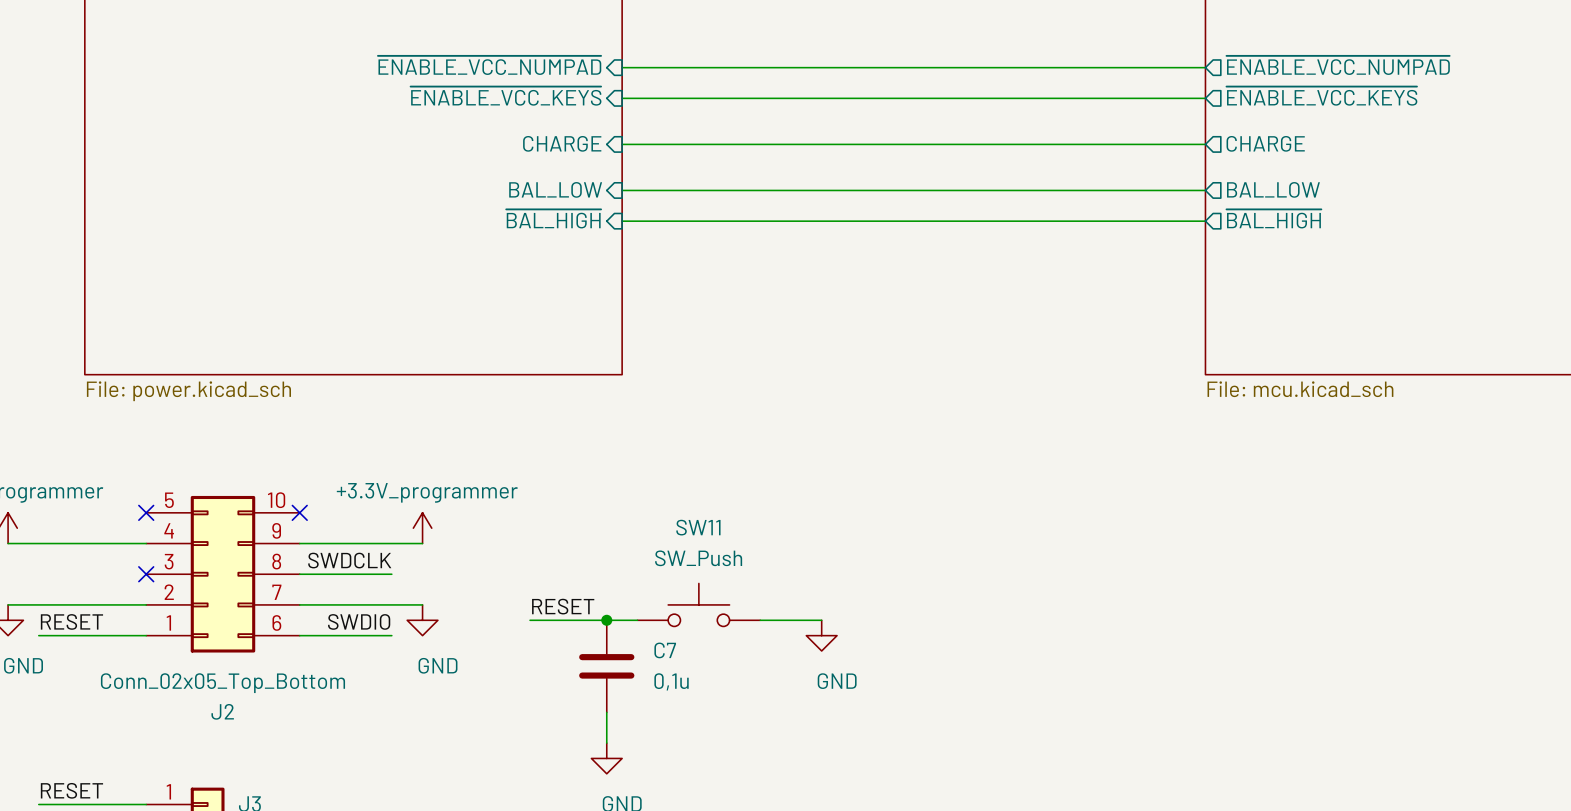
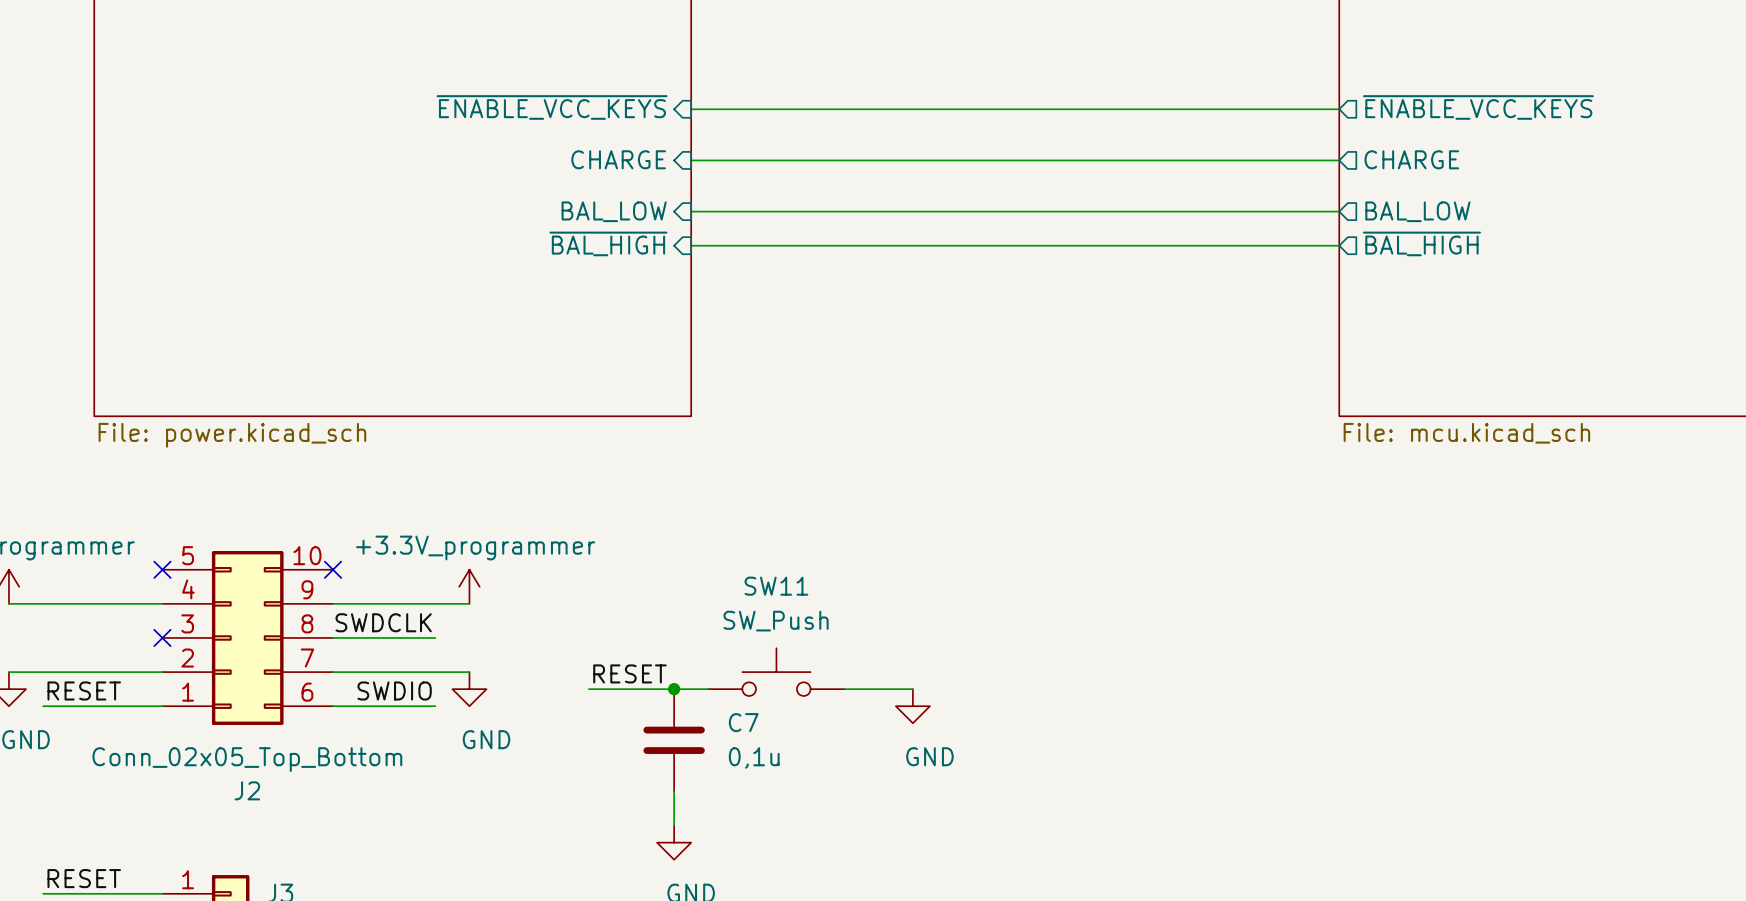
sheet pin: ~{ENABLE_VCC_NUMPAD} (489, 65) -> none
sheet pin: ~{ENABLE_VCC_NUMPAD} (1338, 65) -> none
wire: (622, 67) (1205, 67) -> none

